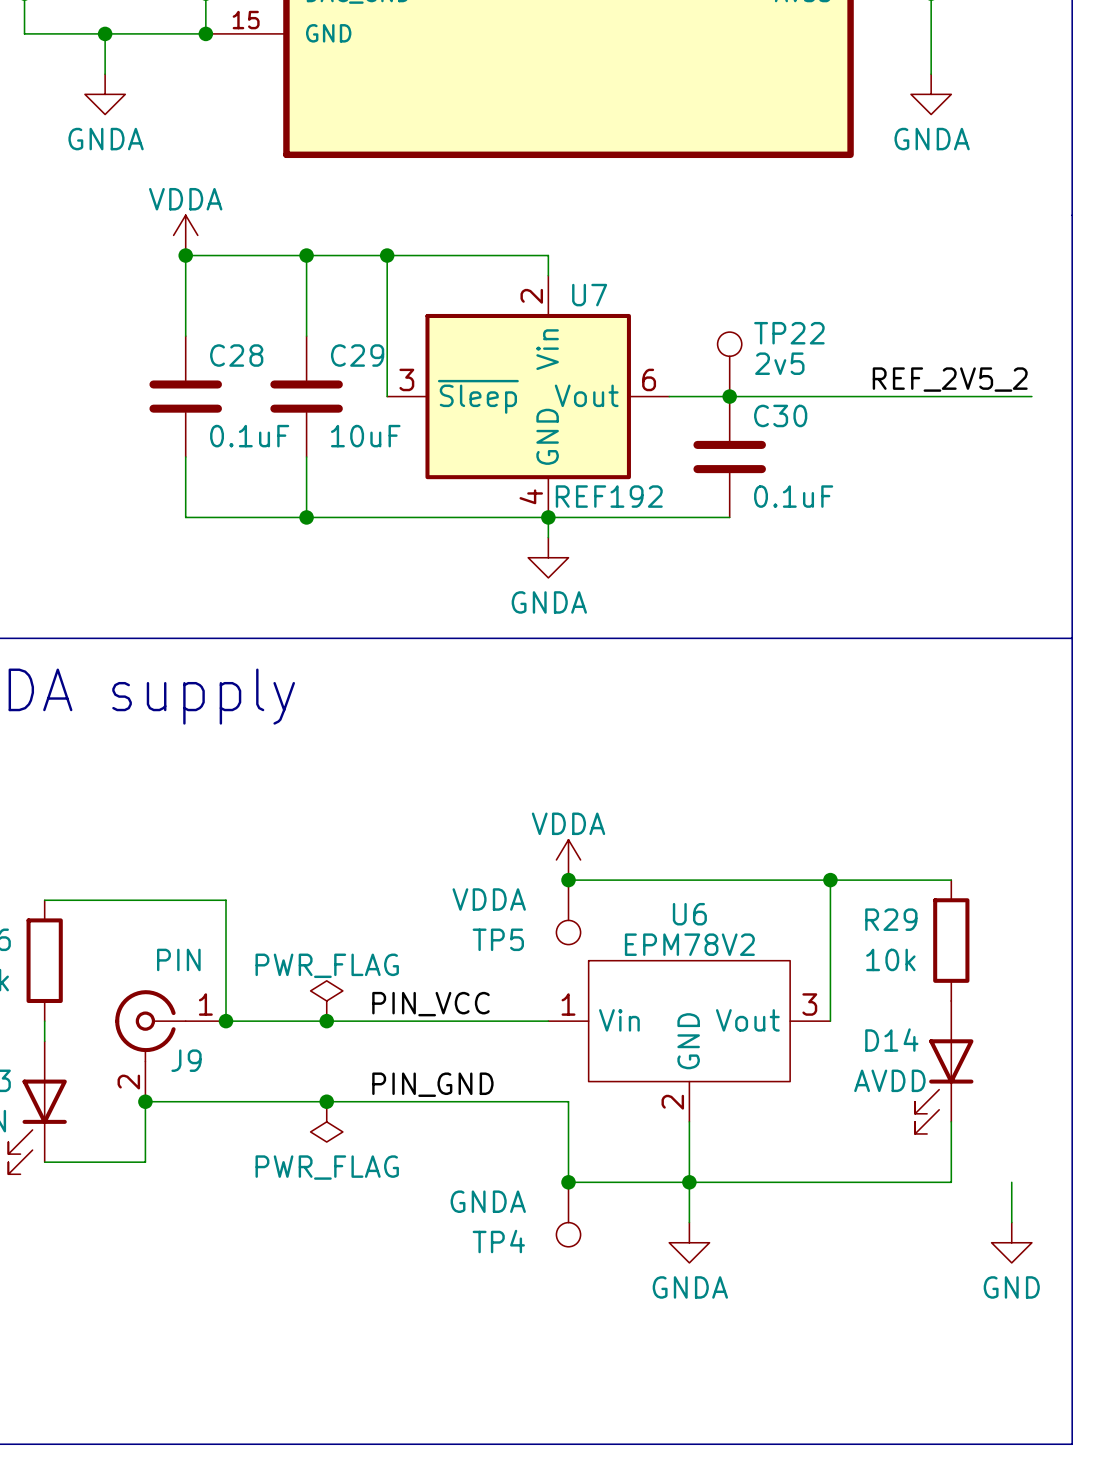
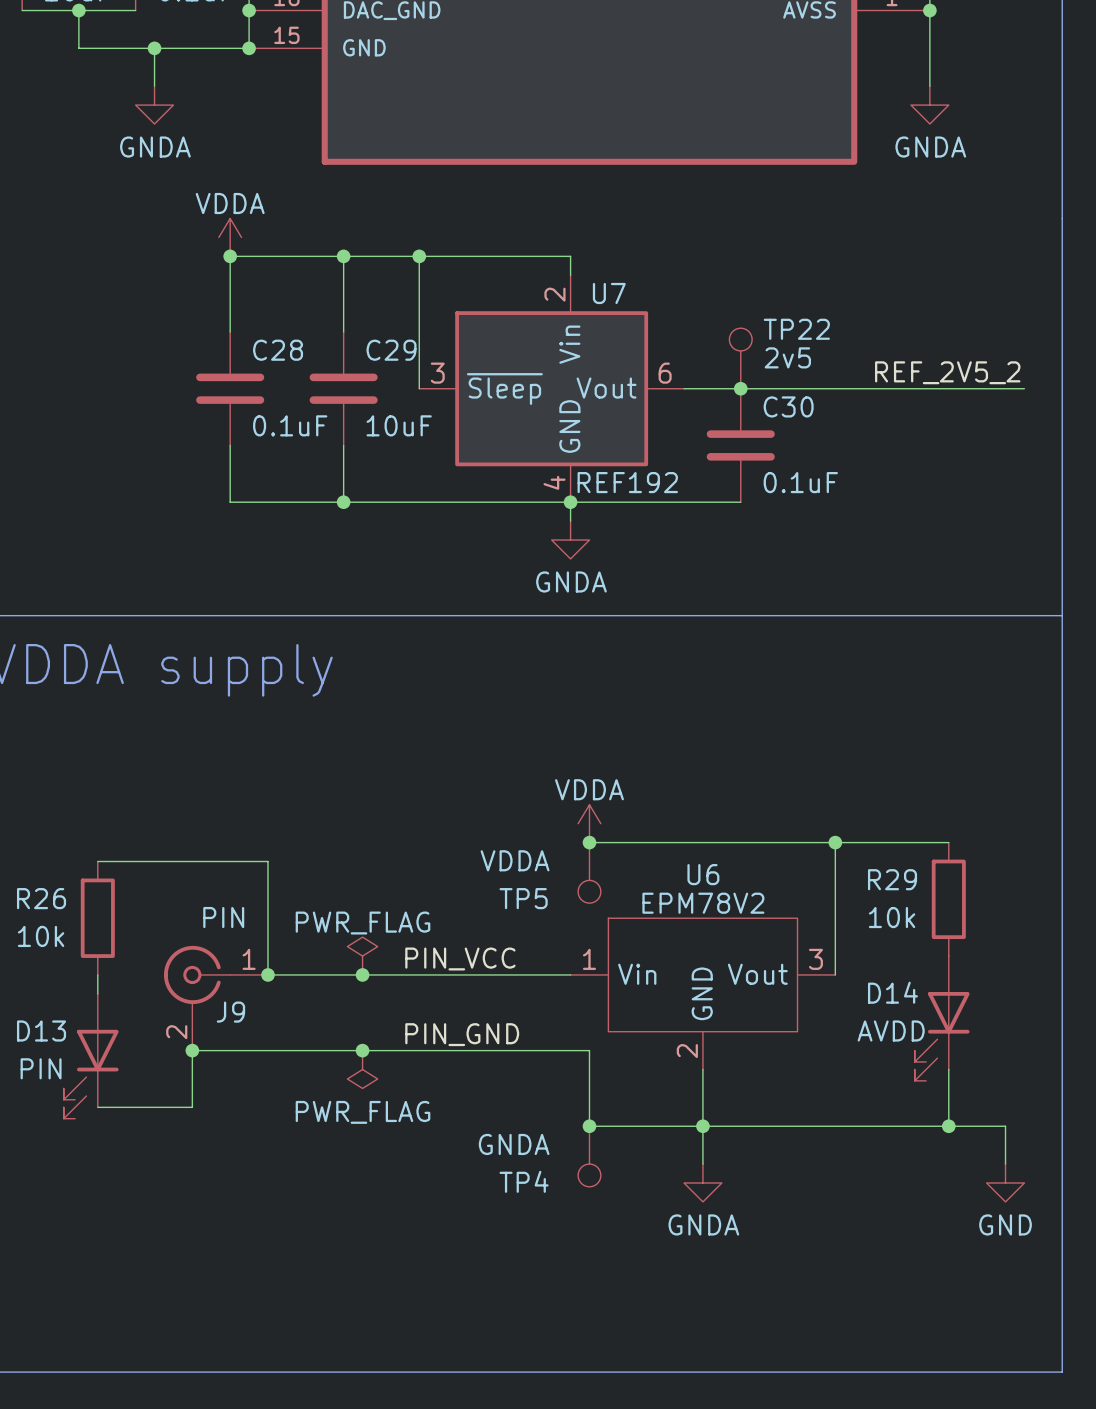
wire: none -> (948, 1126) (1005, 1126)
junction: none -> (948, 1126)

